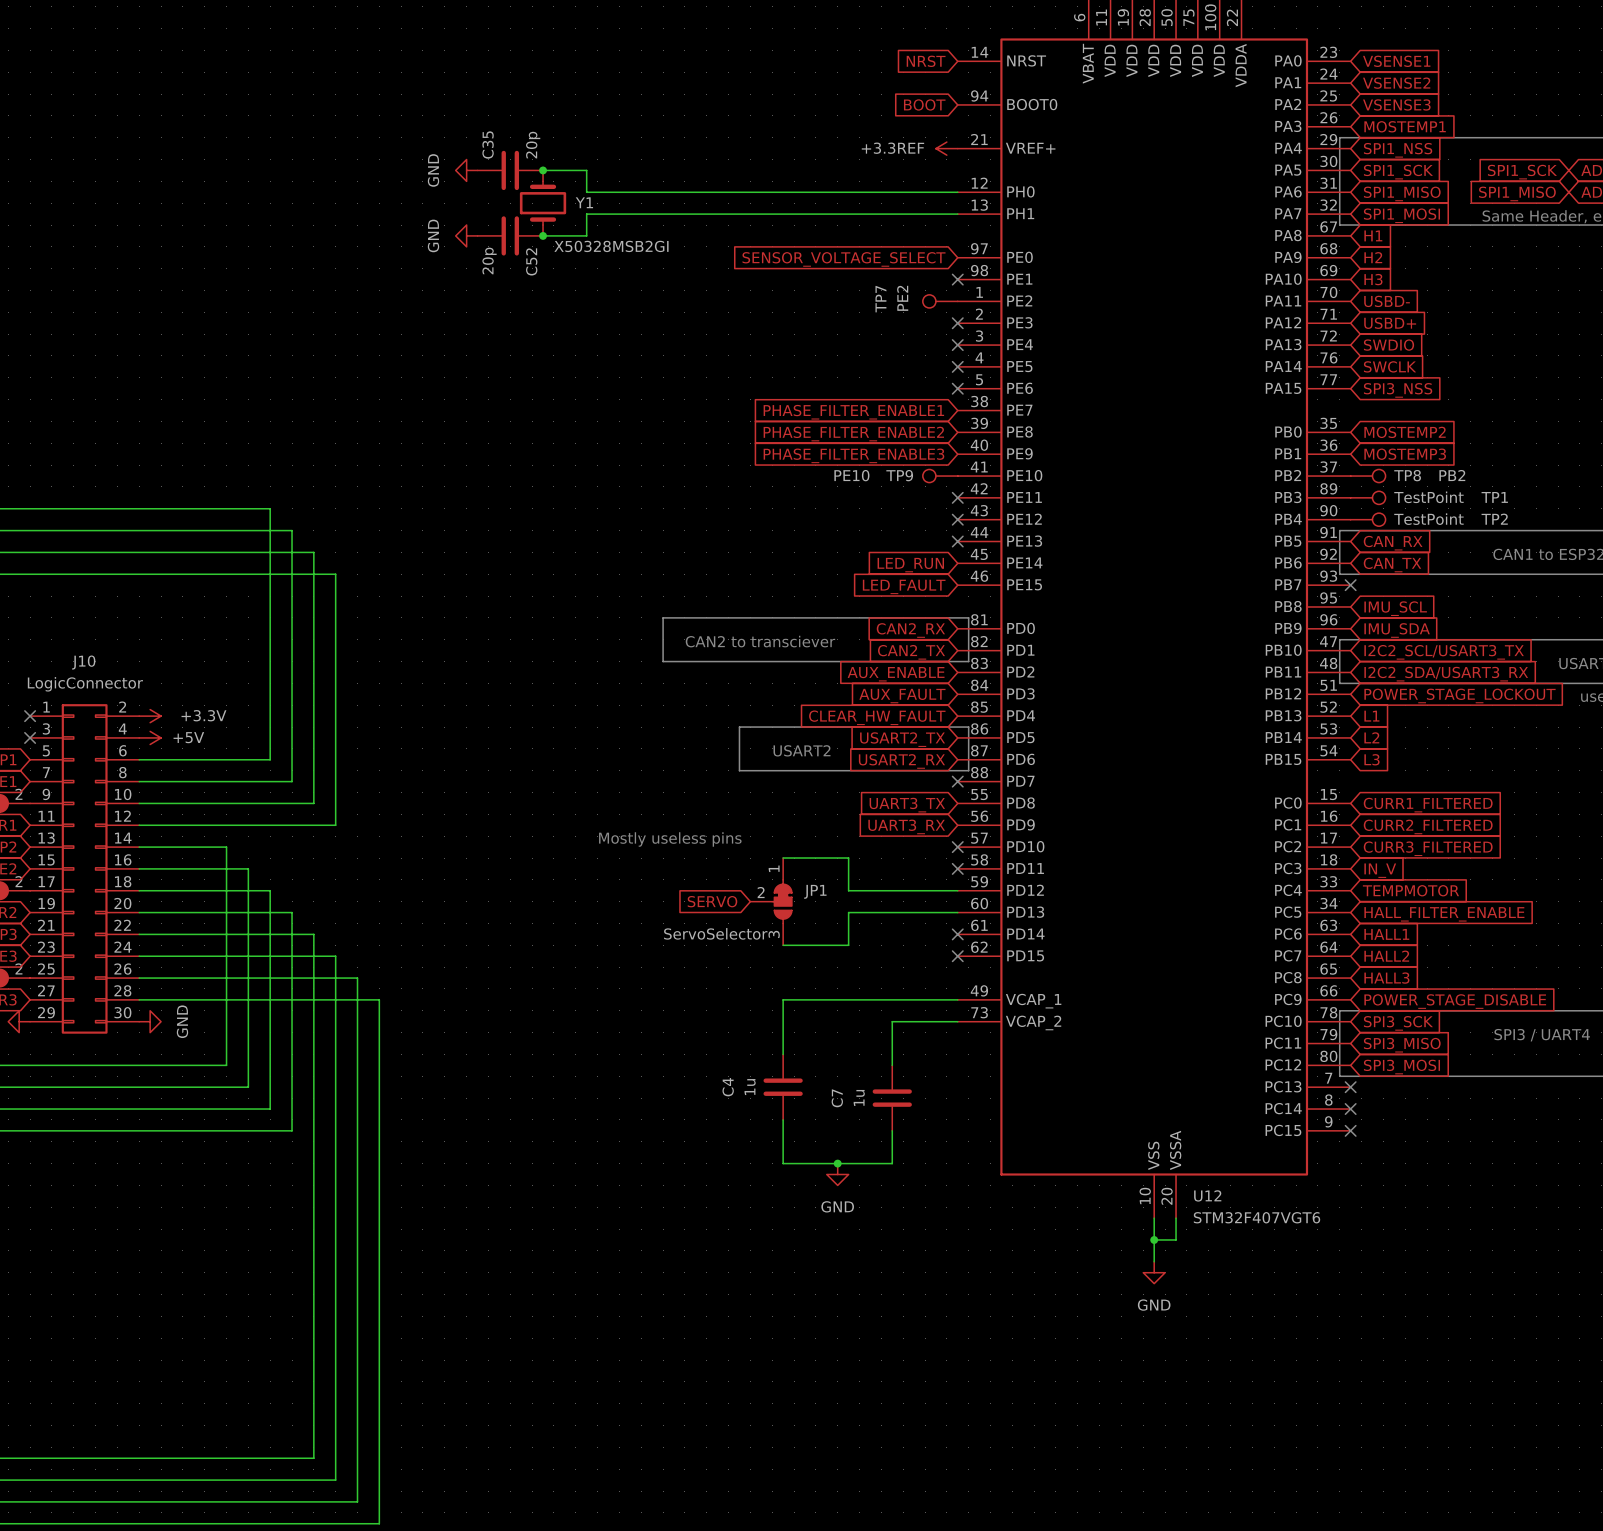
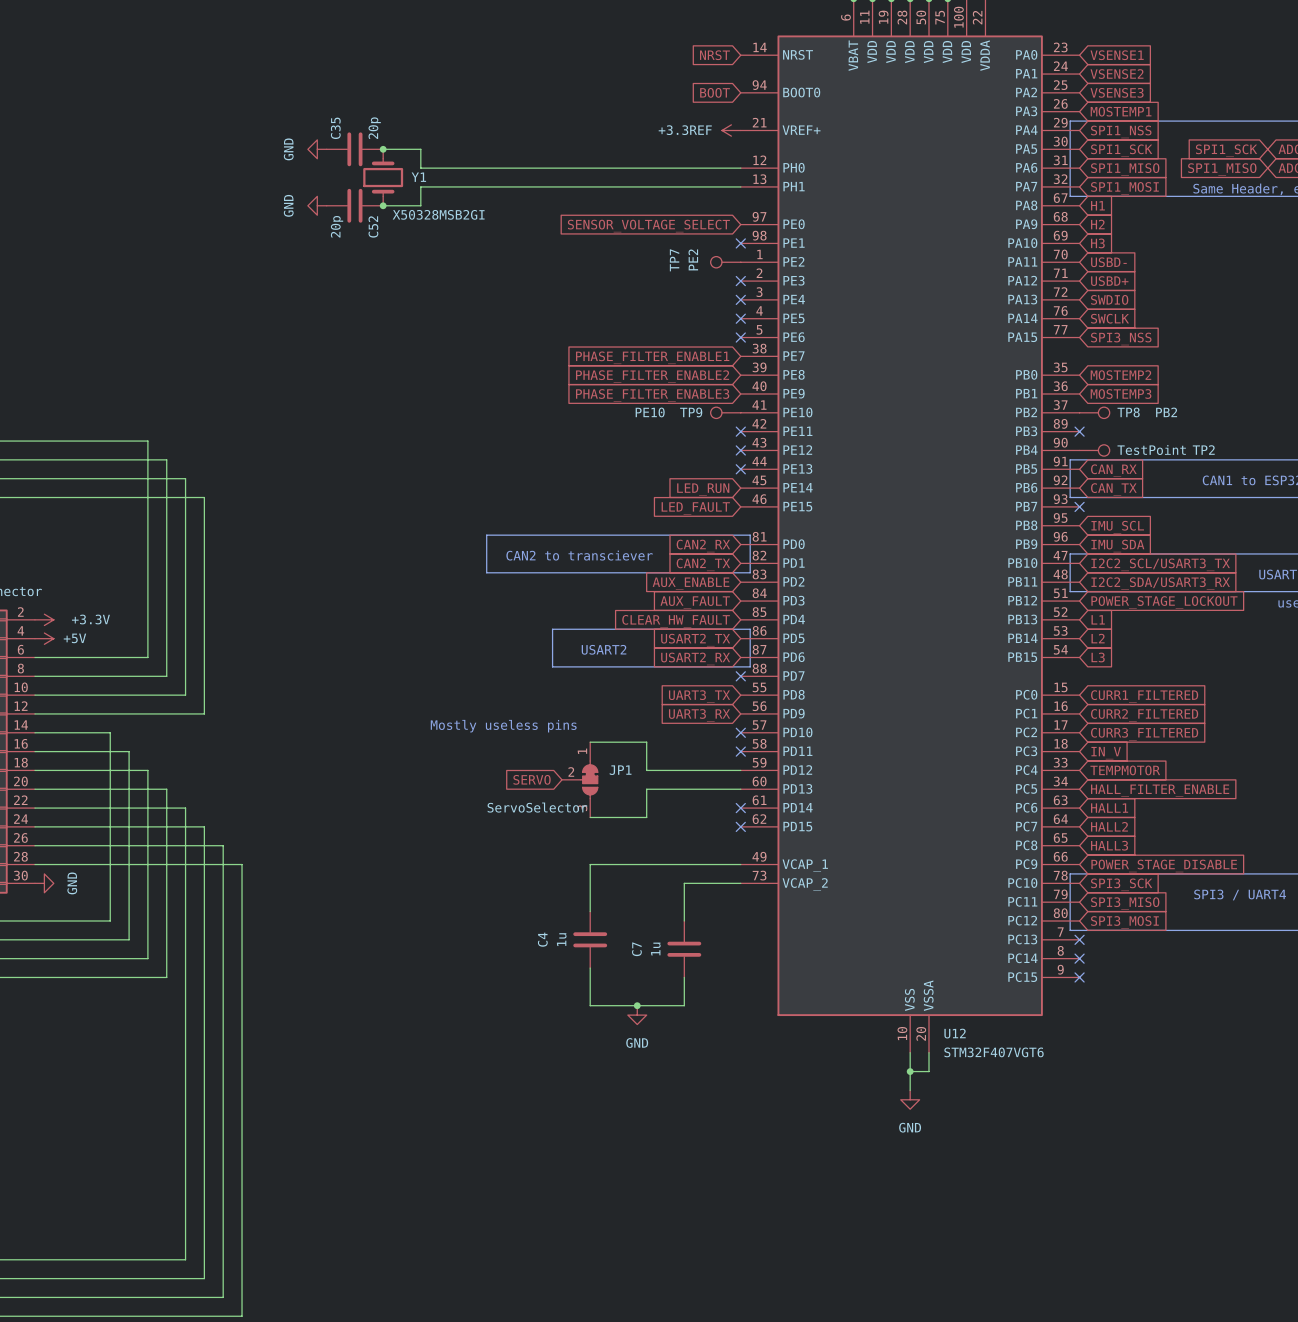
no-connect mark: none -> (1079, 431)
TP1: TestPoint (1368, 497) -> none

